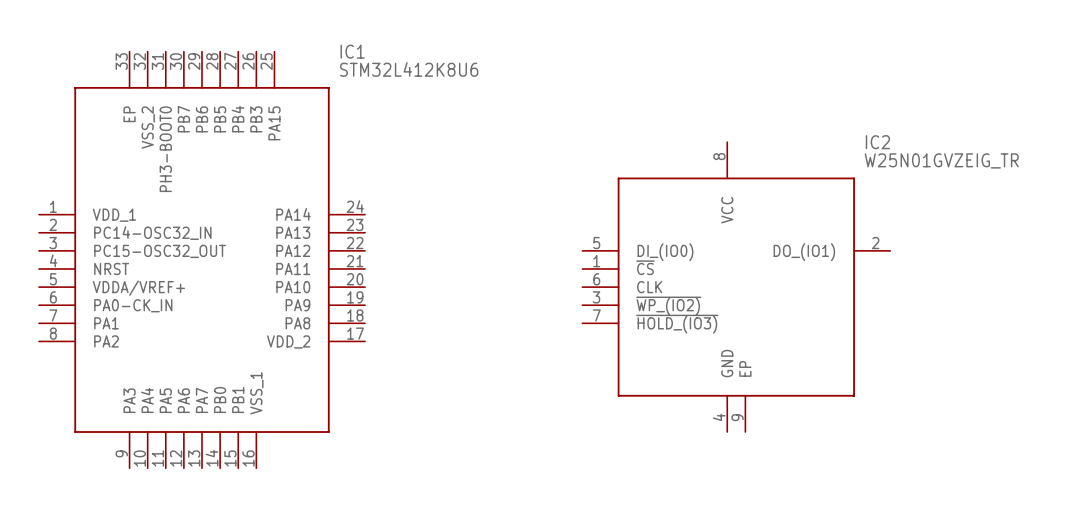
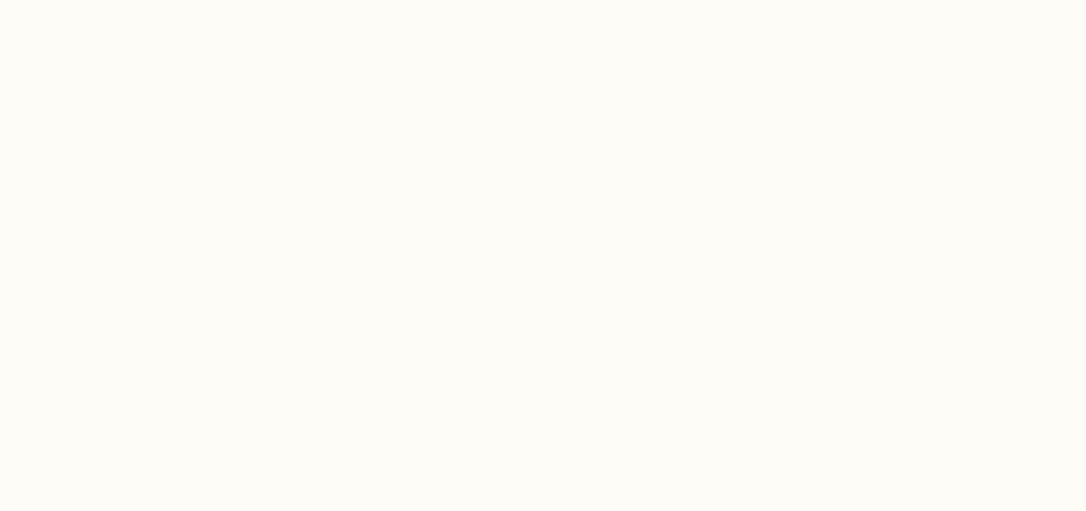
IC1: STM32L412K8U6 (202, 259) -> none
IC2: W25N01GVZEIG_TR (736, 287) -> none

